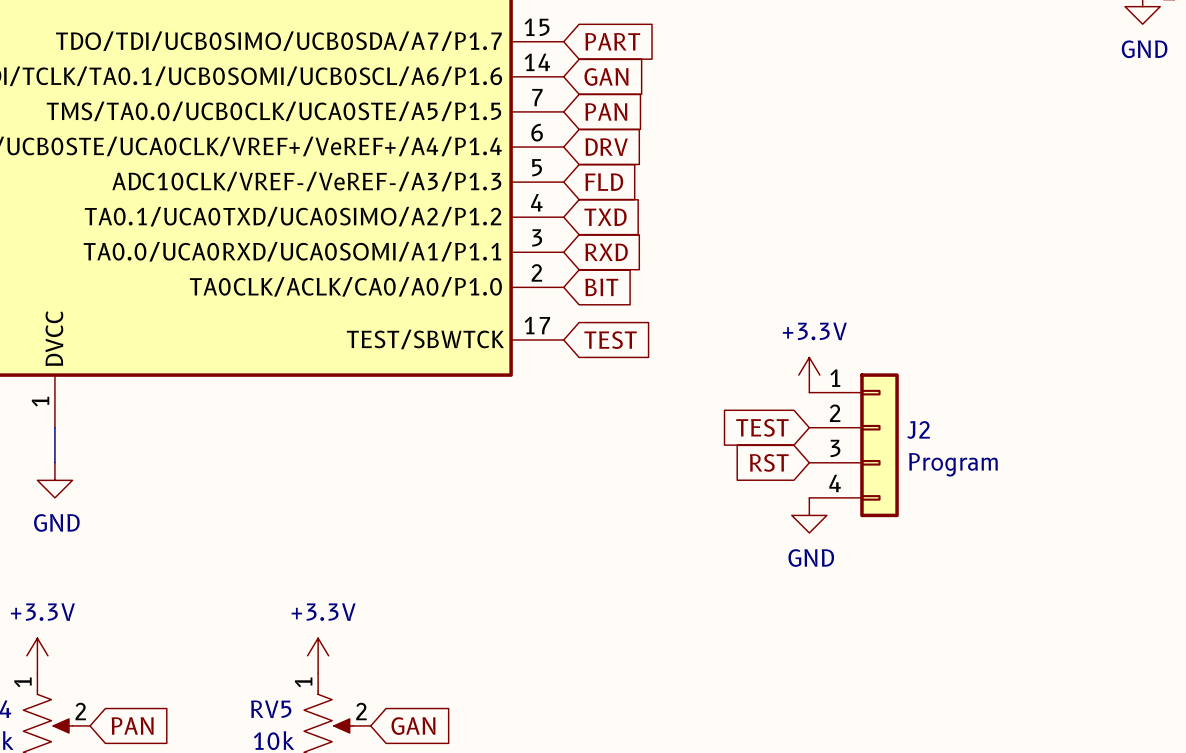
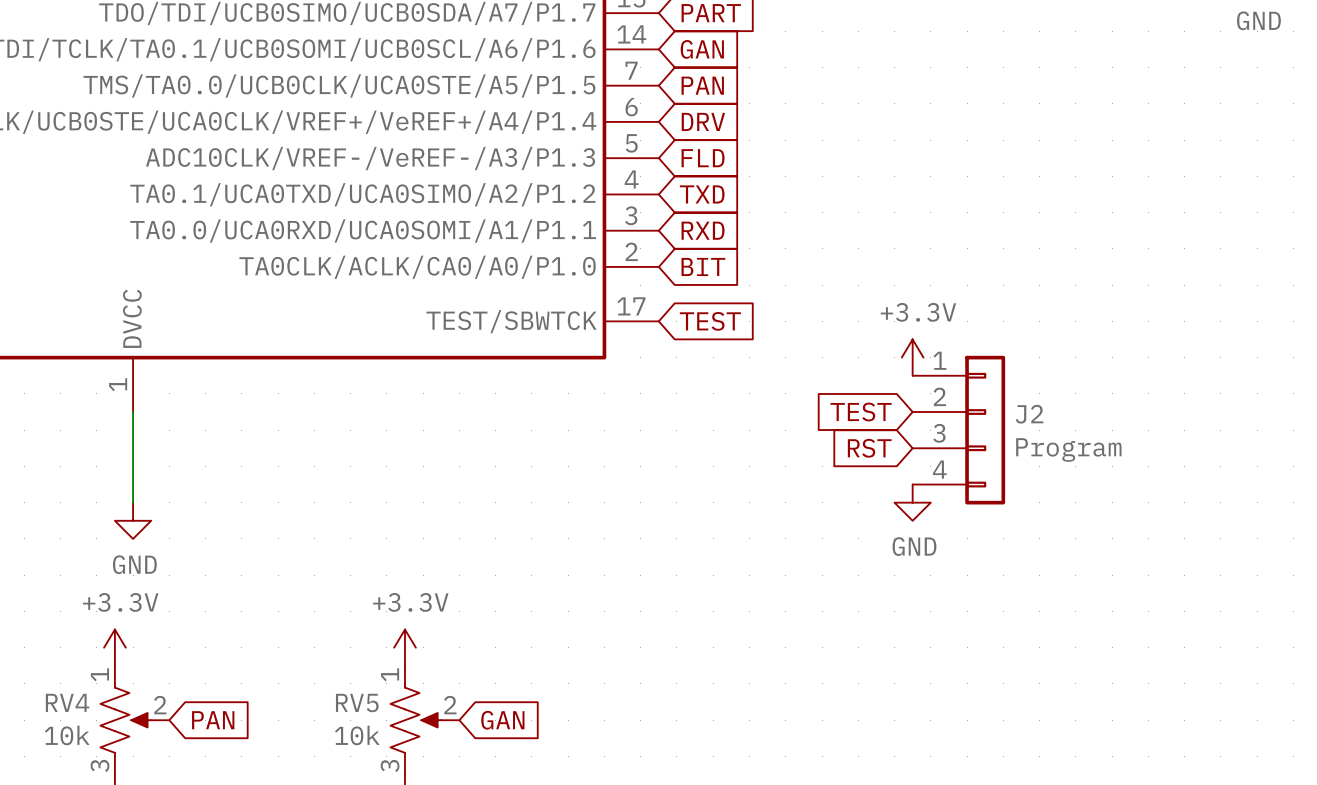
wire: none -> (133, 448) (133, 502)
power symbol position: GND (54, 480) -> GND (133, 520)

